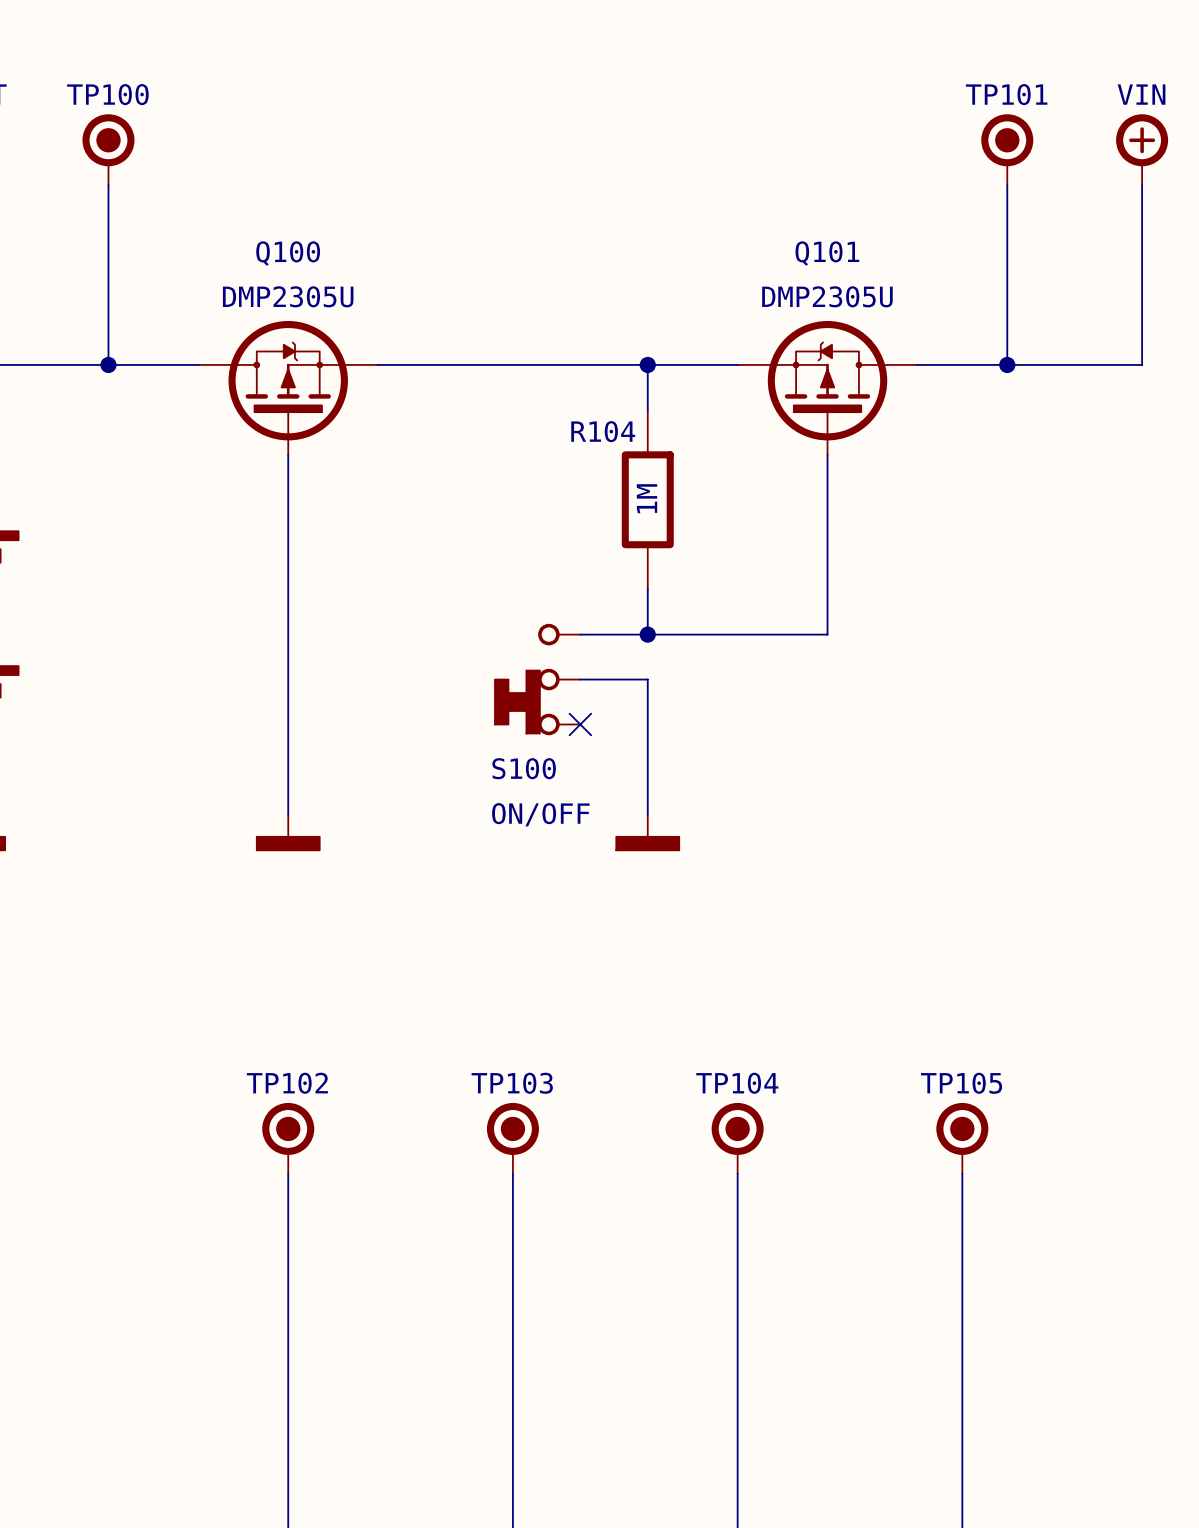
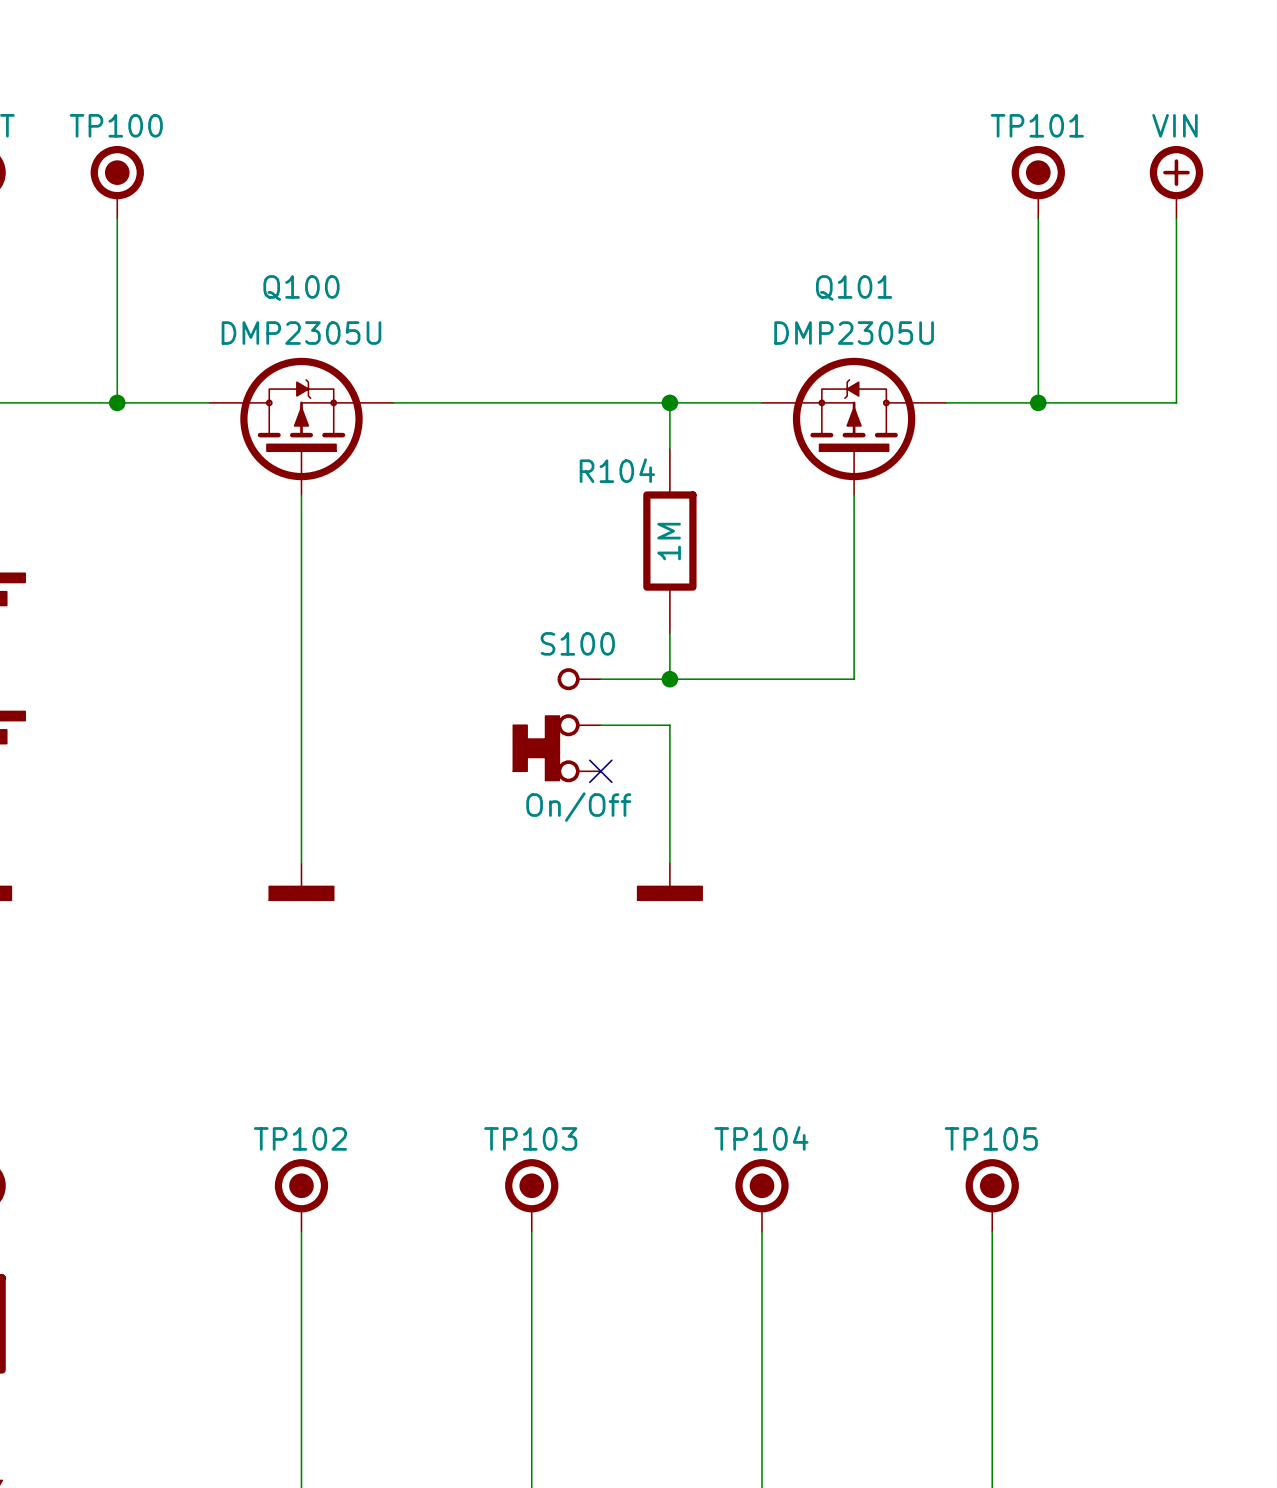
S100 name position: S100 (524, 768) -> S100 (577, 643)
S100 value: ON/OFF (540, 814) -> On/Off (578, 807)

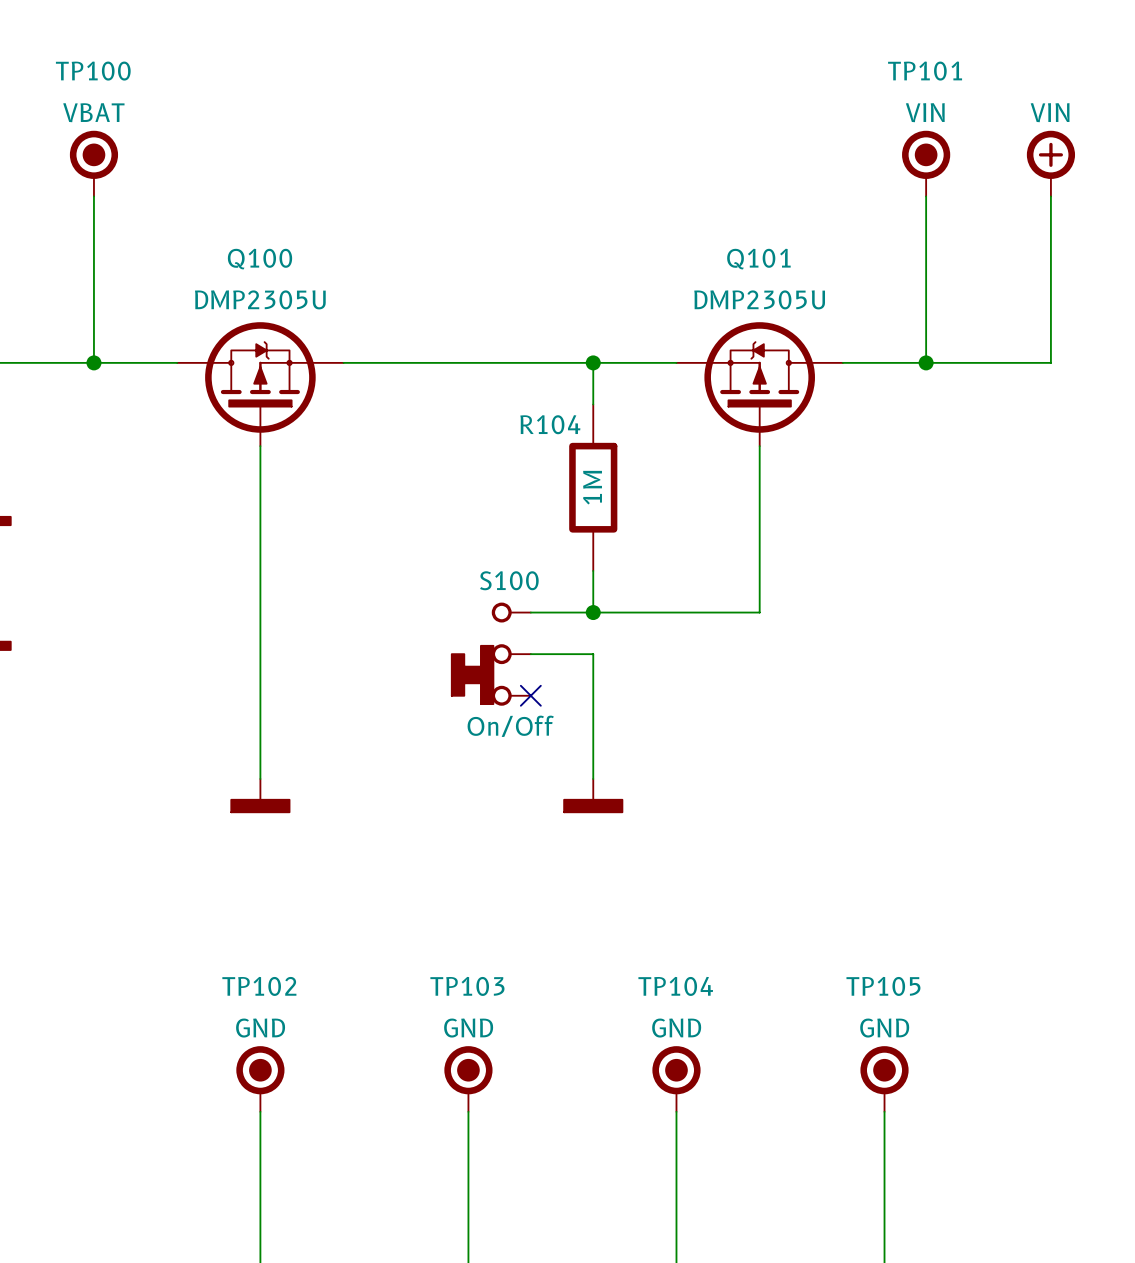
TP100 name position: TP100 (116, 125) -> TP100 (93, 71)
TP100 text: none -> VBAT (93, 112)
TP101 text: none -> VIN (925, 112)
TP101 name position: TP101 (1037, 125) -> TP101 (925, 71)
TP102 name position: TP102 (300, 1138) -> TP102 (259, 986)
TP102 text: none -> GND (260, 1028)
TP103 name position: TP103 (530, 1138) -> TP103 (467, 986)
TP103 text: none -> GND (468, 1028)
TP104 text: none -> GND (676, 1028)
TP104 name position: TP104 (761, 1138) -> TP104 (675, 986)
TP105 name position: TP105 (991, 1138) -> TP105 (883, 986)
TP105 text: none -> GND (884, 1028)

